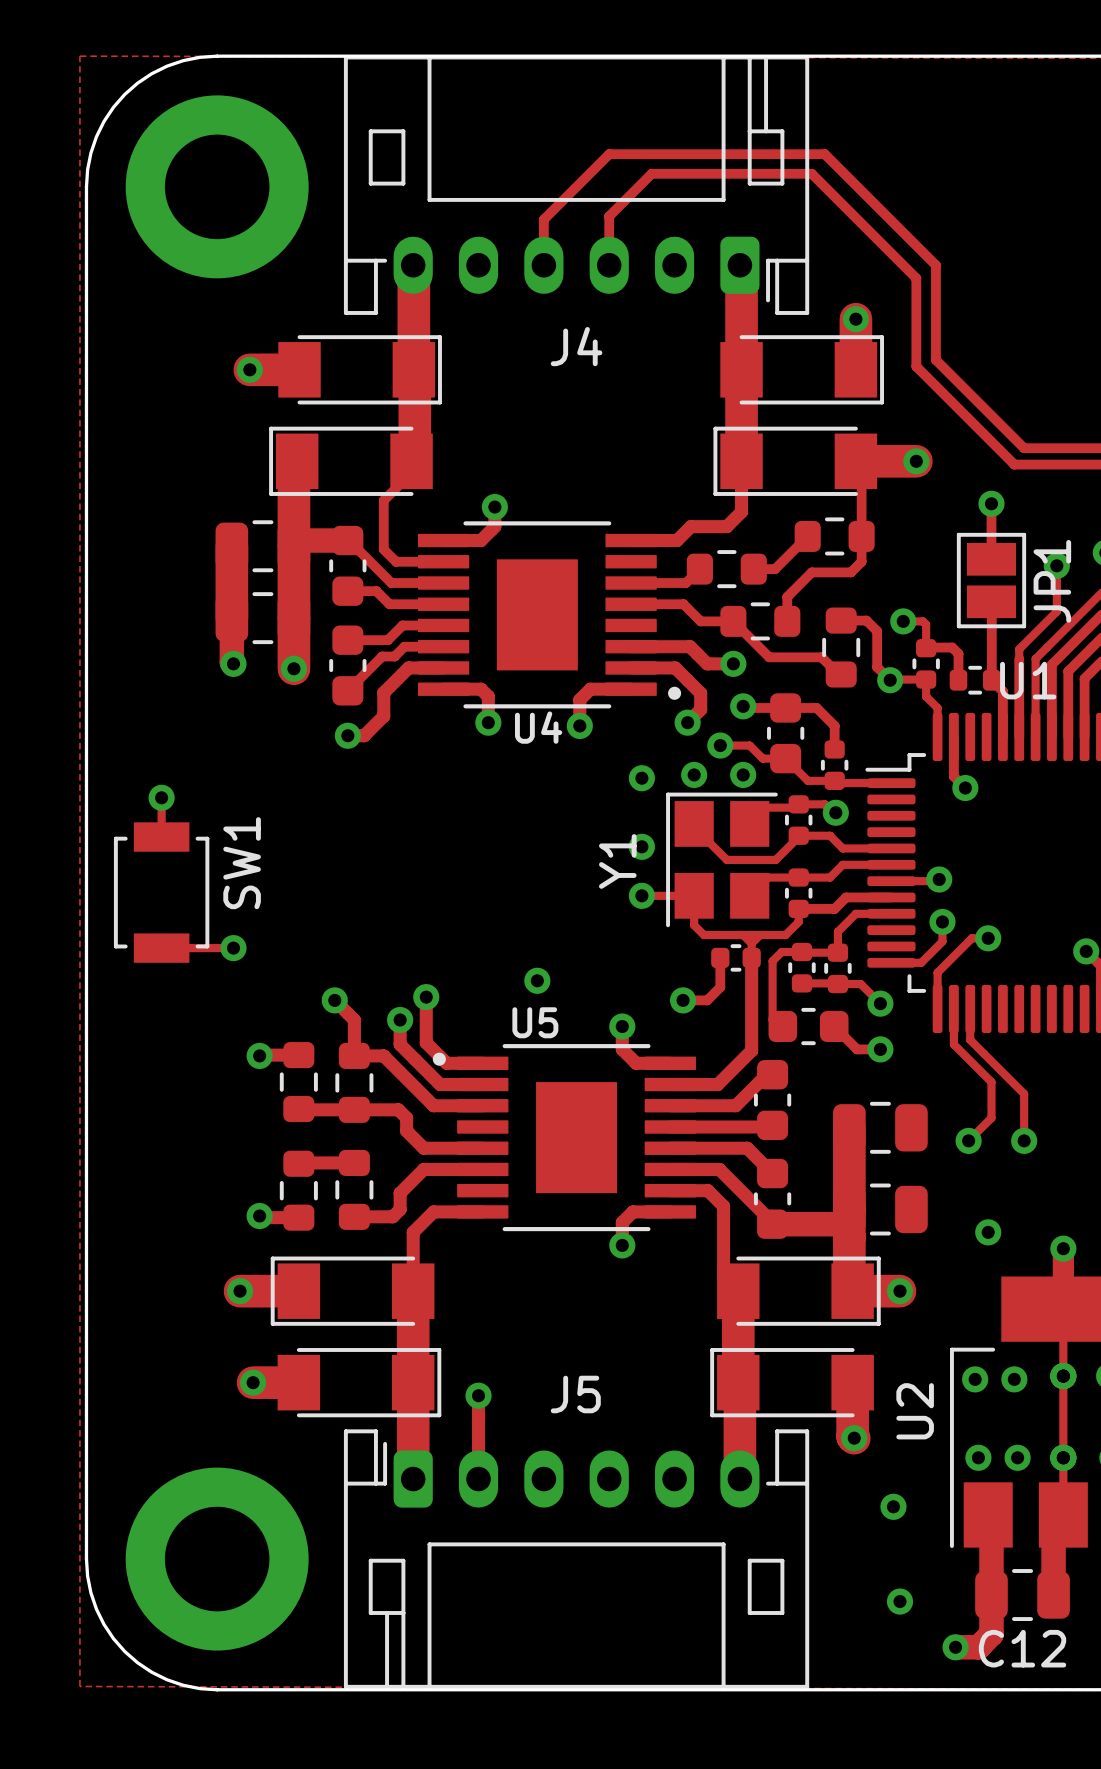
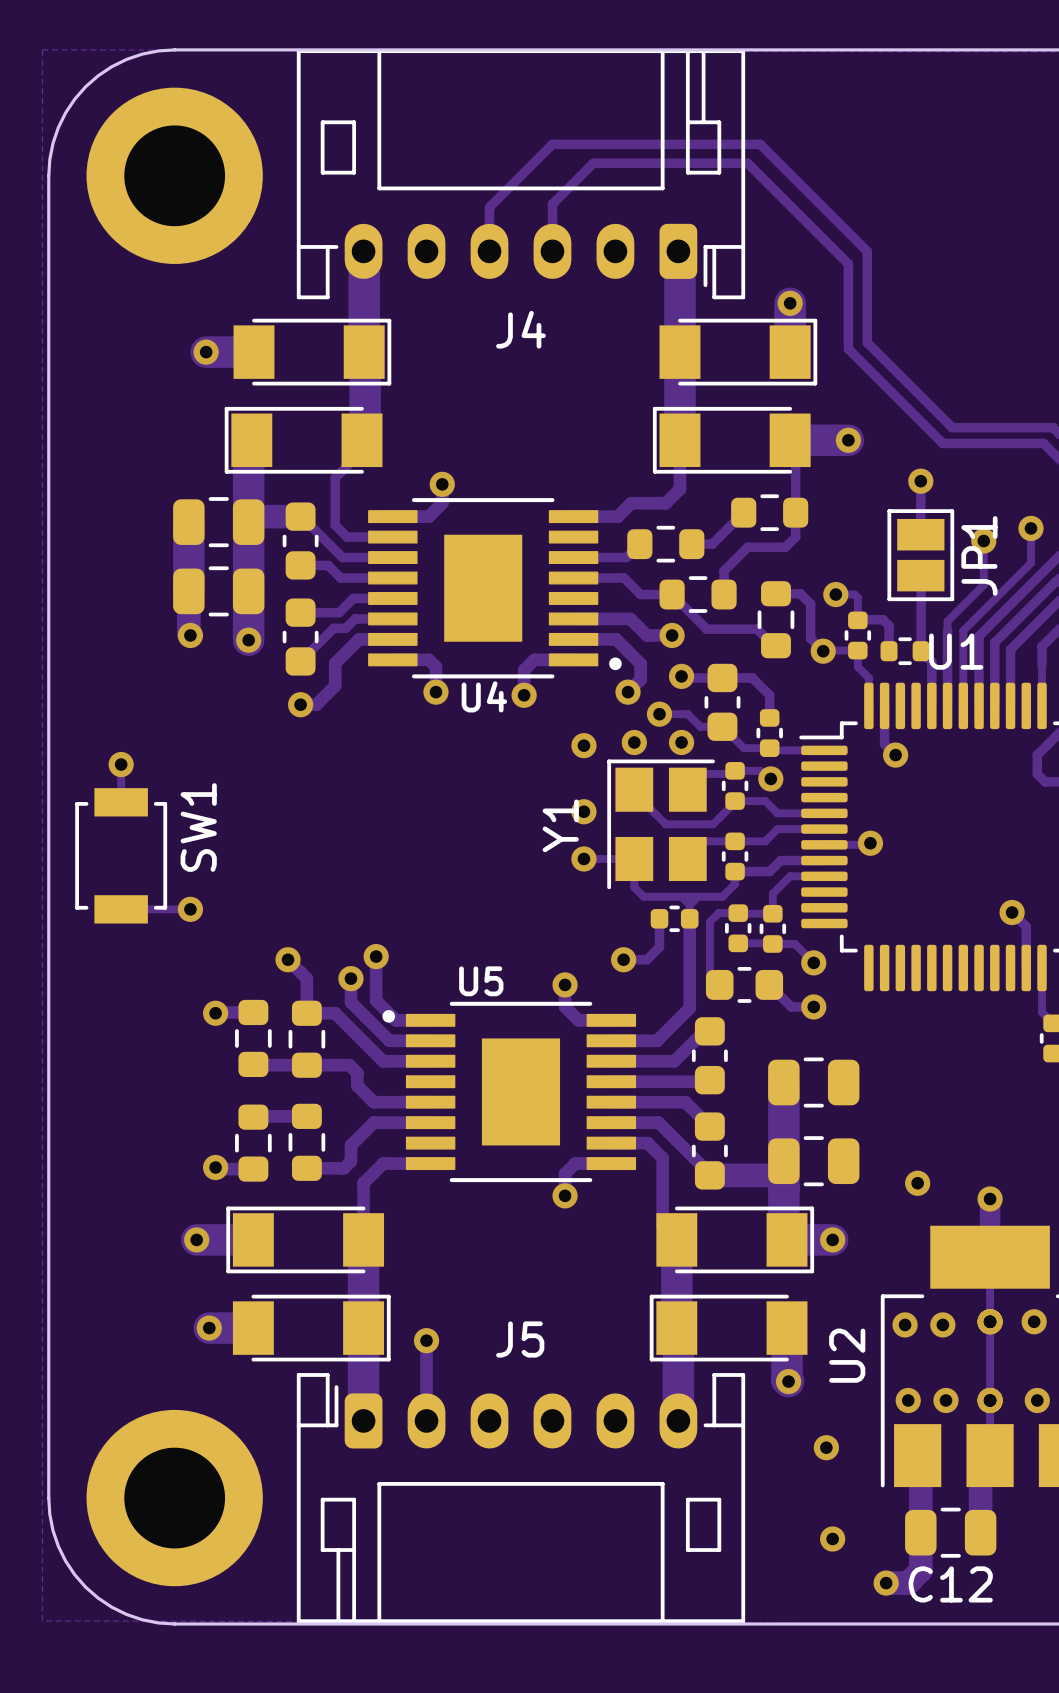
track: (942, 921) (942, 941) (921, 962) (891, 962) -> none
via: (942, 921) -> none
track: (988, 938) (971, 938) (937, 972) (937, 1008) -> none
via: (988, 938) -> none
via: (537, 980) -> none
track: (953, 1008) (953, 1044) (991, 1082) (991, 1118) (968, 1140) -> none
track: (970, 1008) (970, 1040) (1024, 1093) (1024, 1140) -> none
via: (968, 1140) -> none
via: (1024, 1140) -> none

